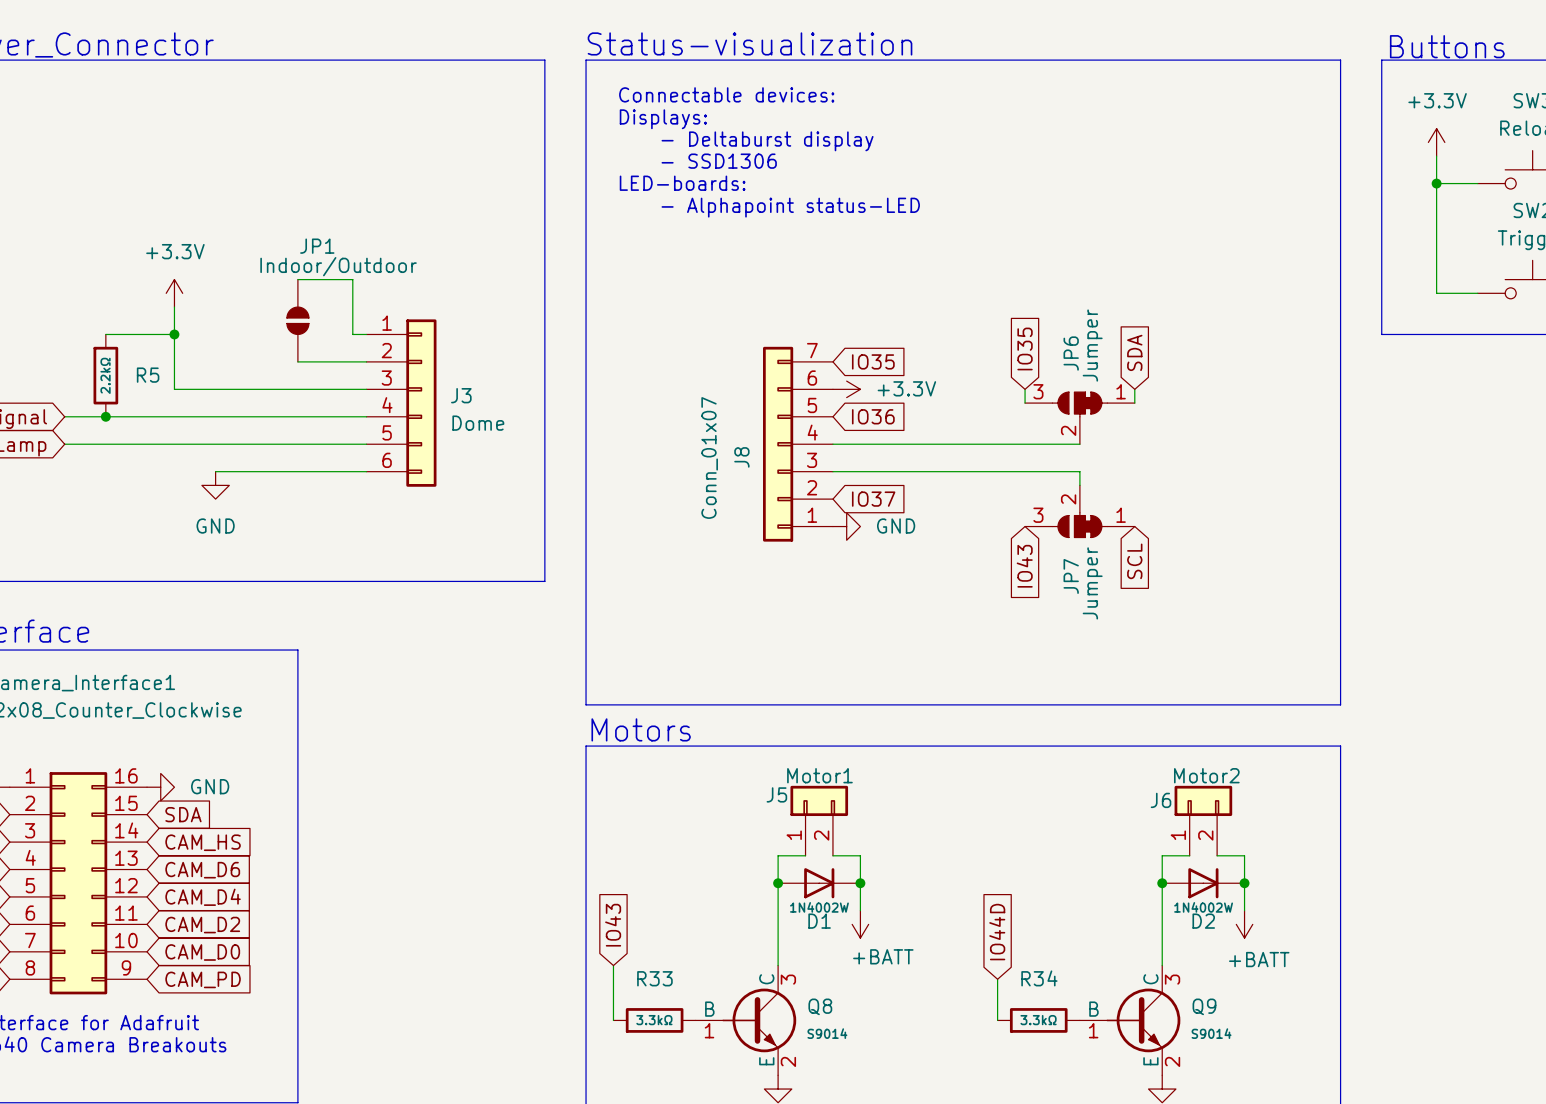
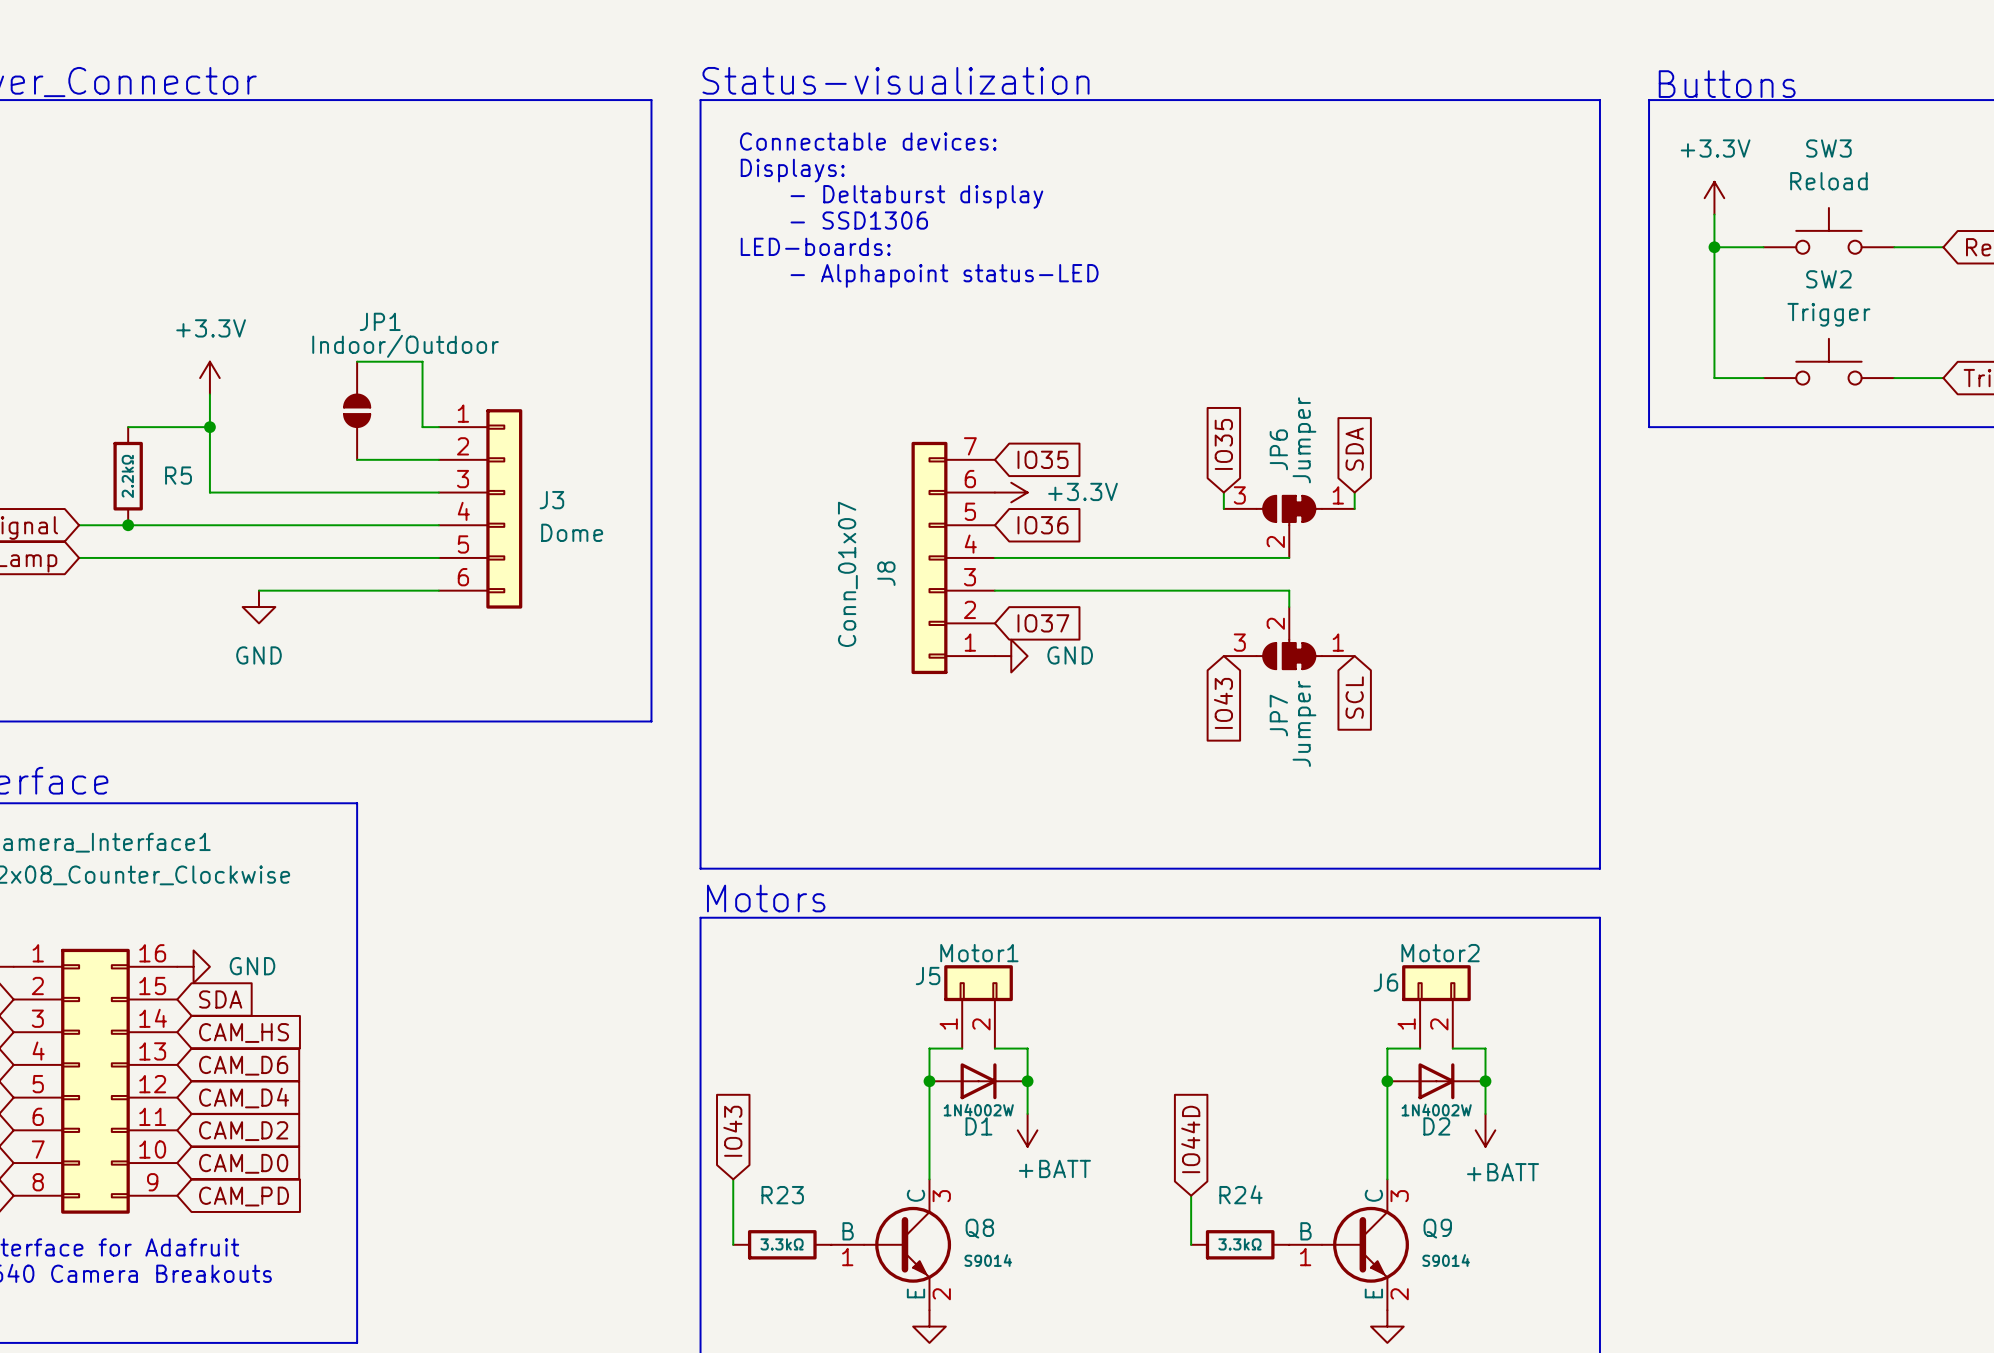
R33 name: R33 (654, 978) -> R23 (782, 1195)
R34 name: R34 (1039, 978) -> R24 (1240, 1194)

